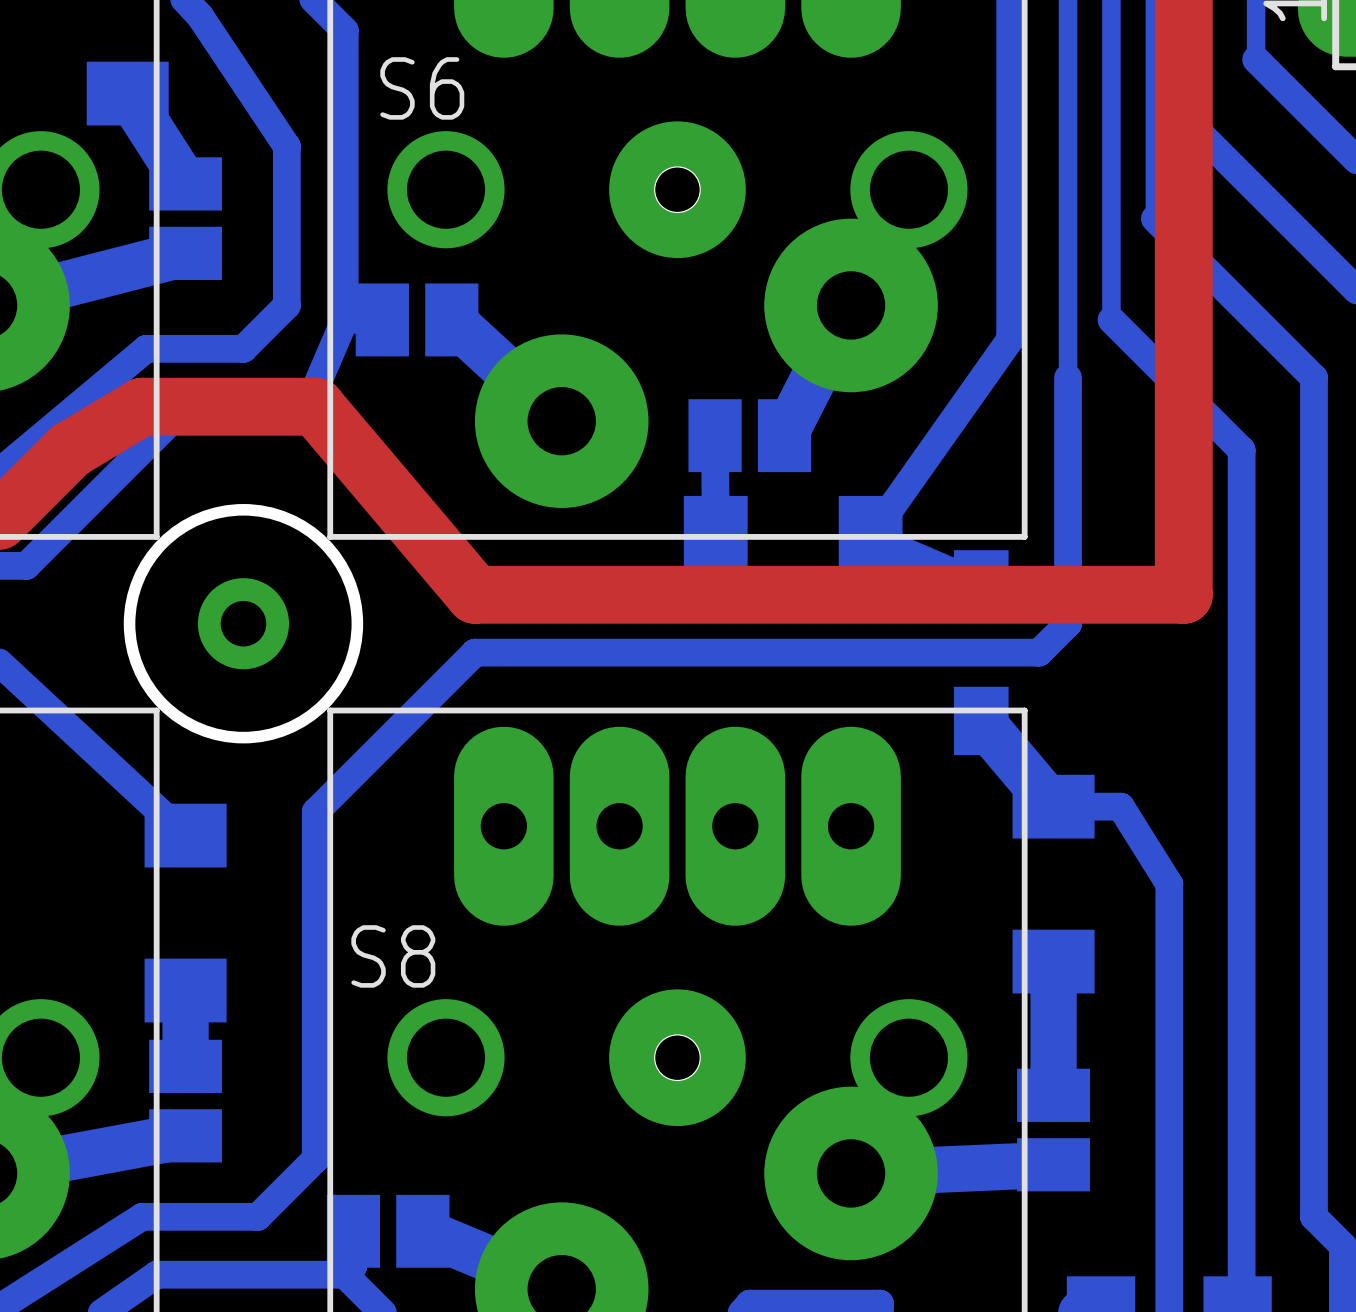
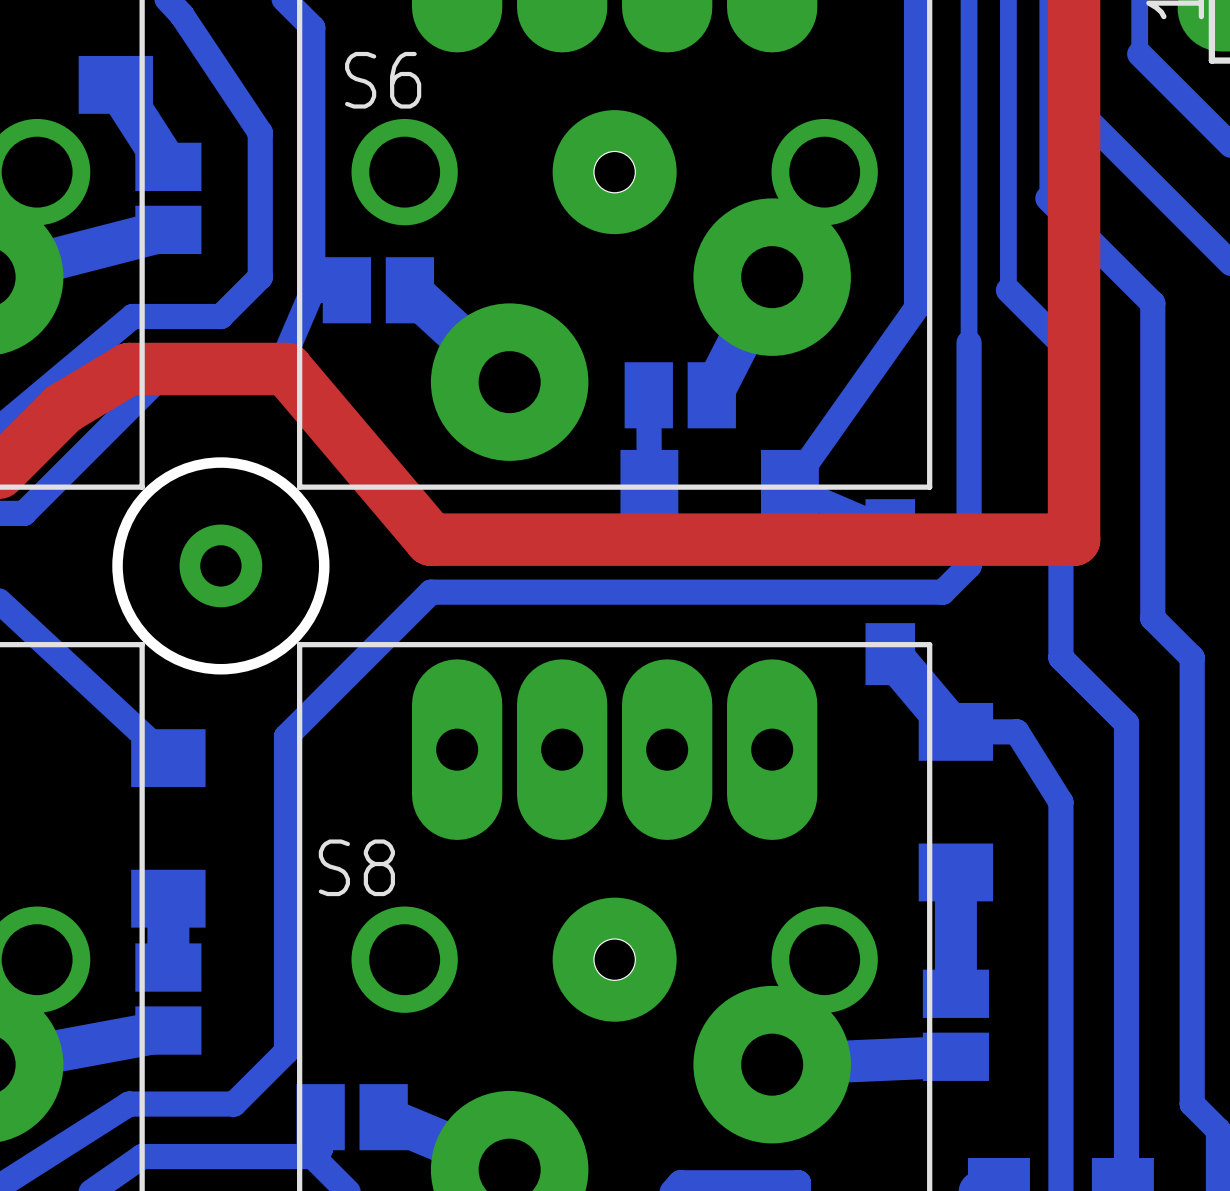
bottom track: (1270, 334) (1313, 377) (1313, 724) -> (1152, 303) (1152, 618) (1192, 657)
bottom track: (1169, 377) (1241, 450) (1241, 797) -> (1060, 342) (1060, 657) (1126, 723)

